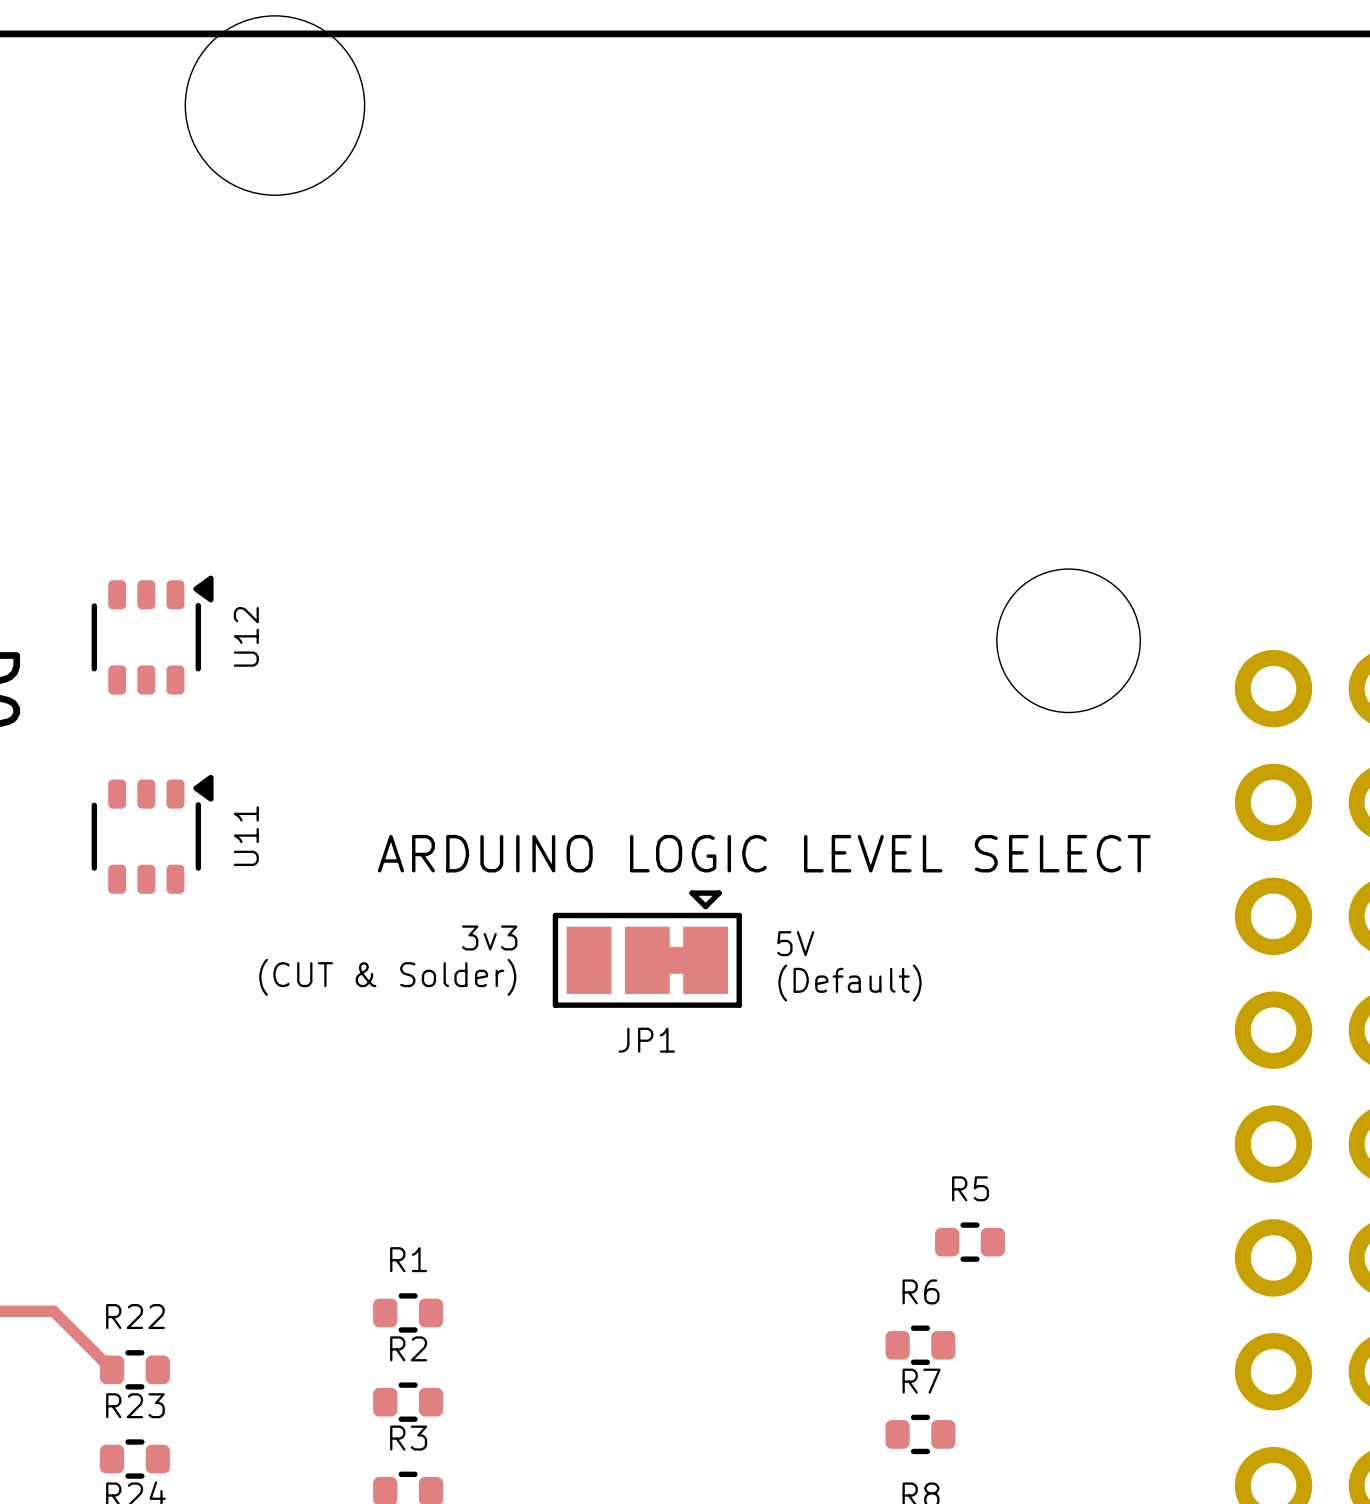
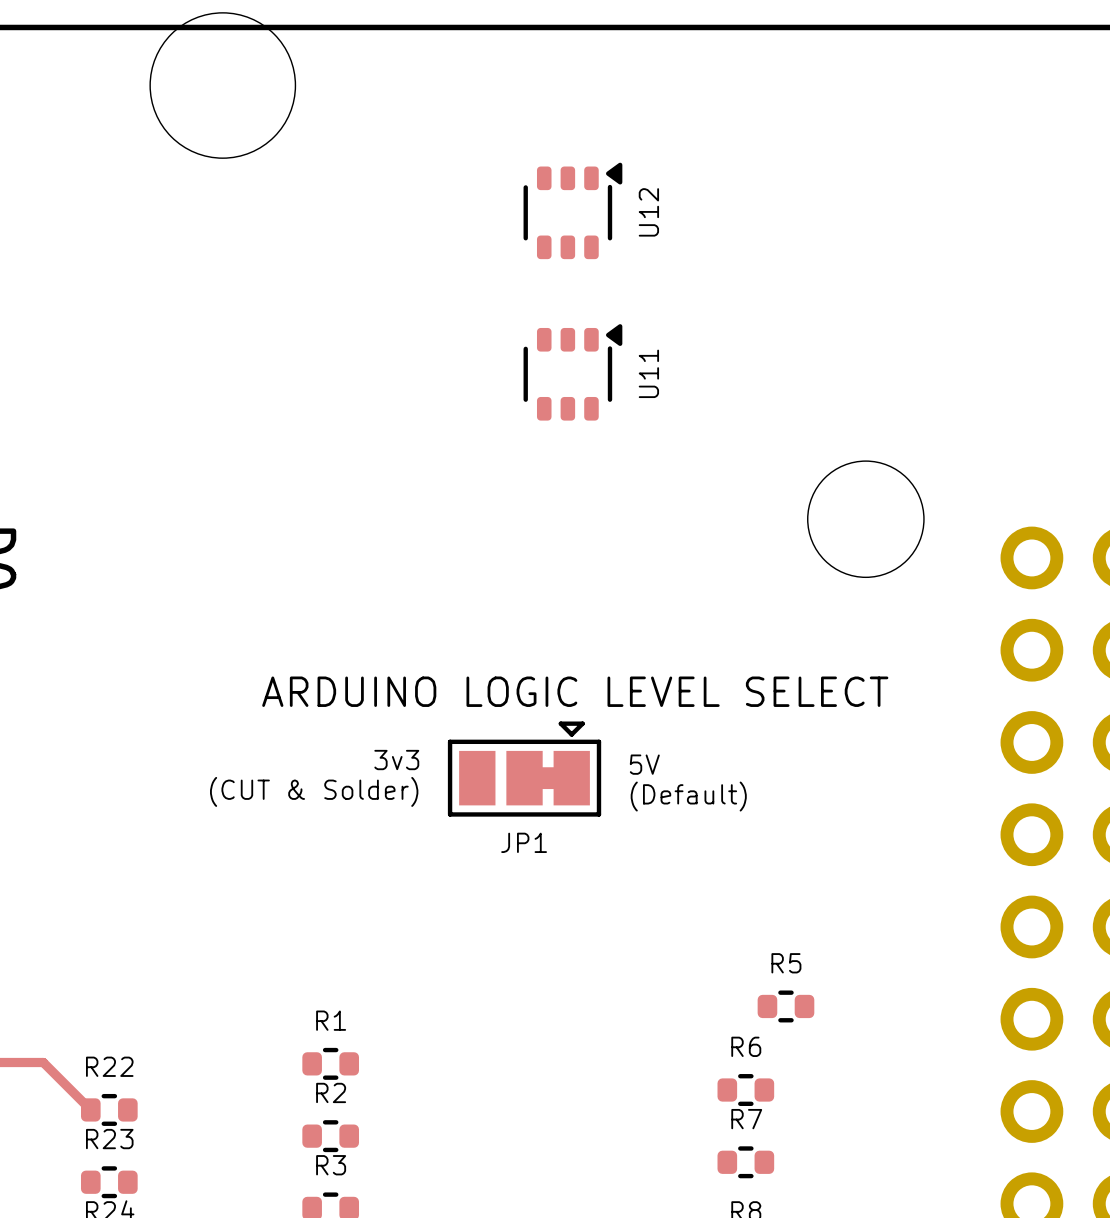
U12 position: (152, 635) -> (572, 210)
U11 position: (152, 834) -> (572, 372)
text position: ARDUINO LOGIC LEVEL SELECT (764, 853) -> ARDUINO LOGIC LEVEL SELECT (575, 691)

